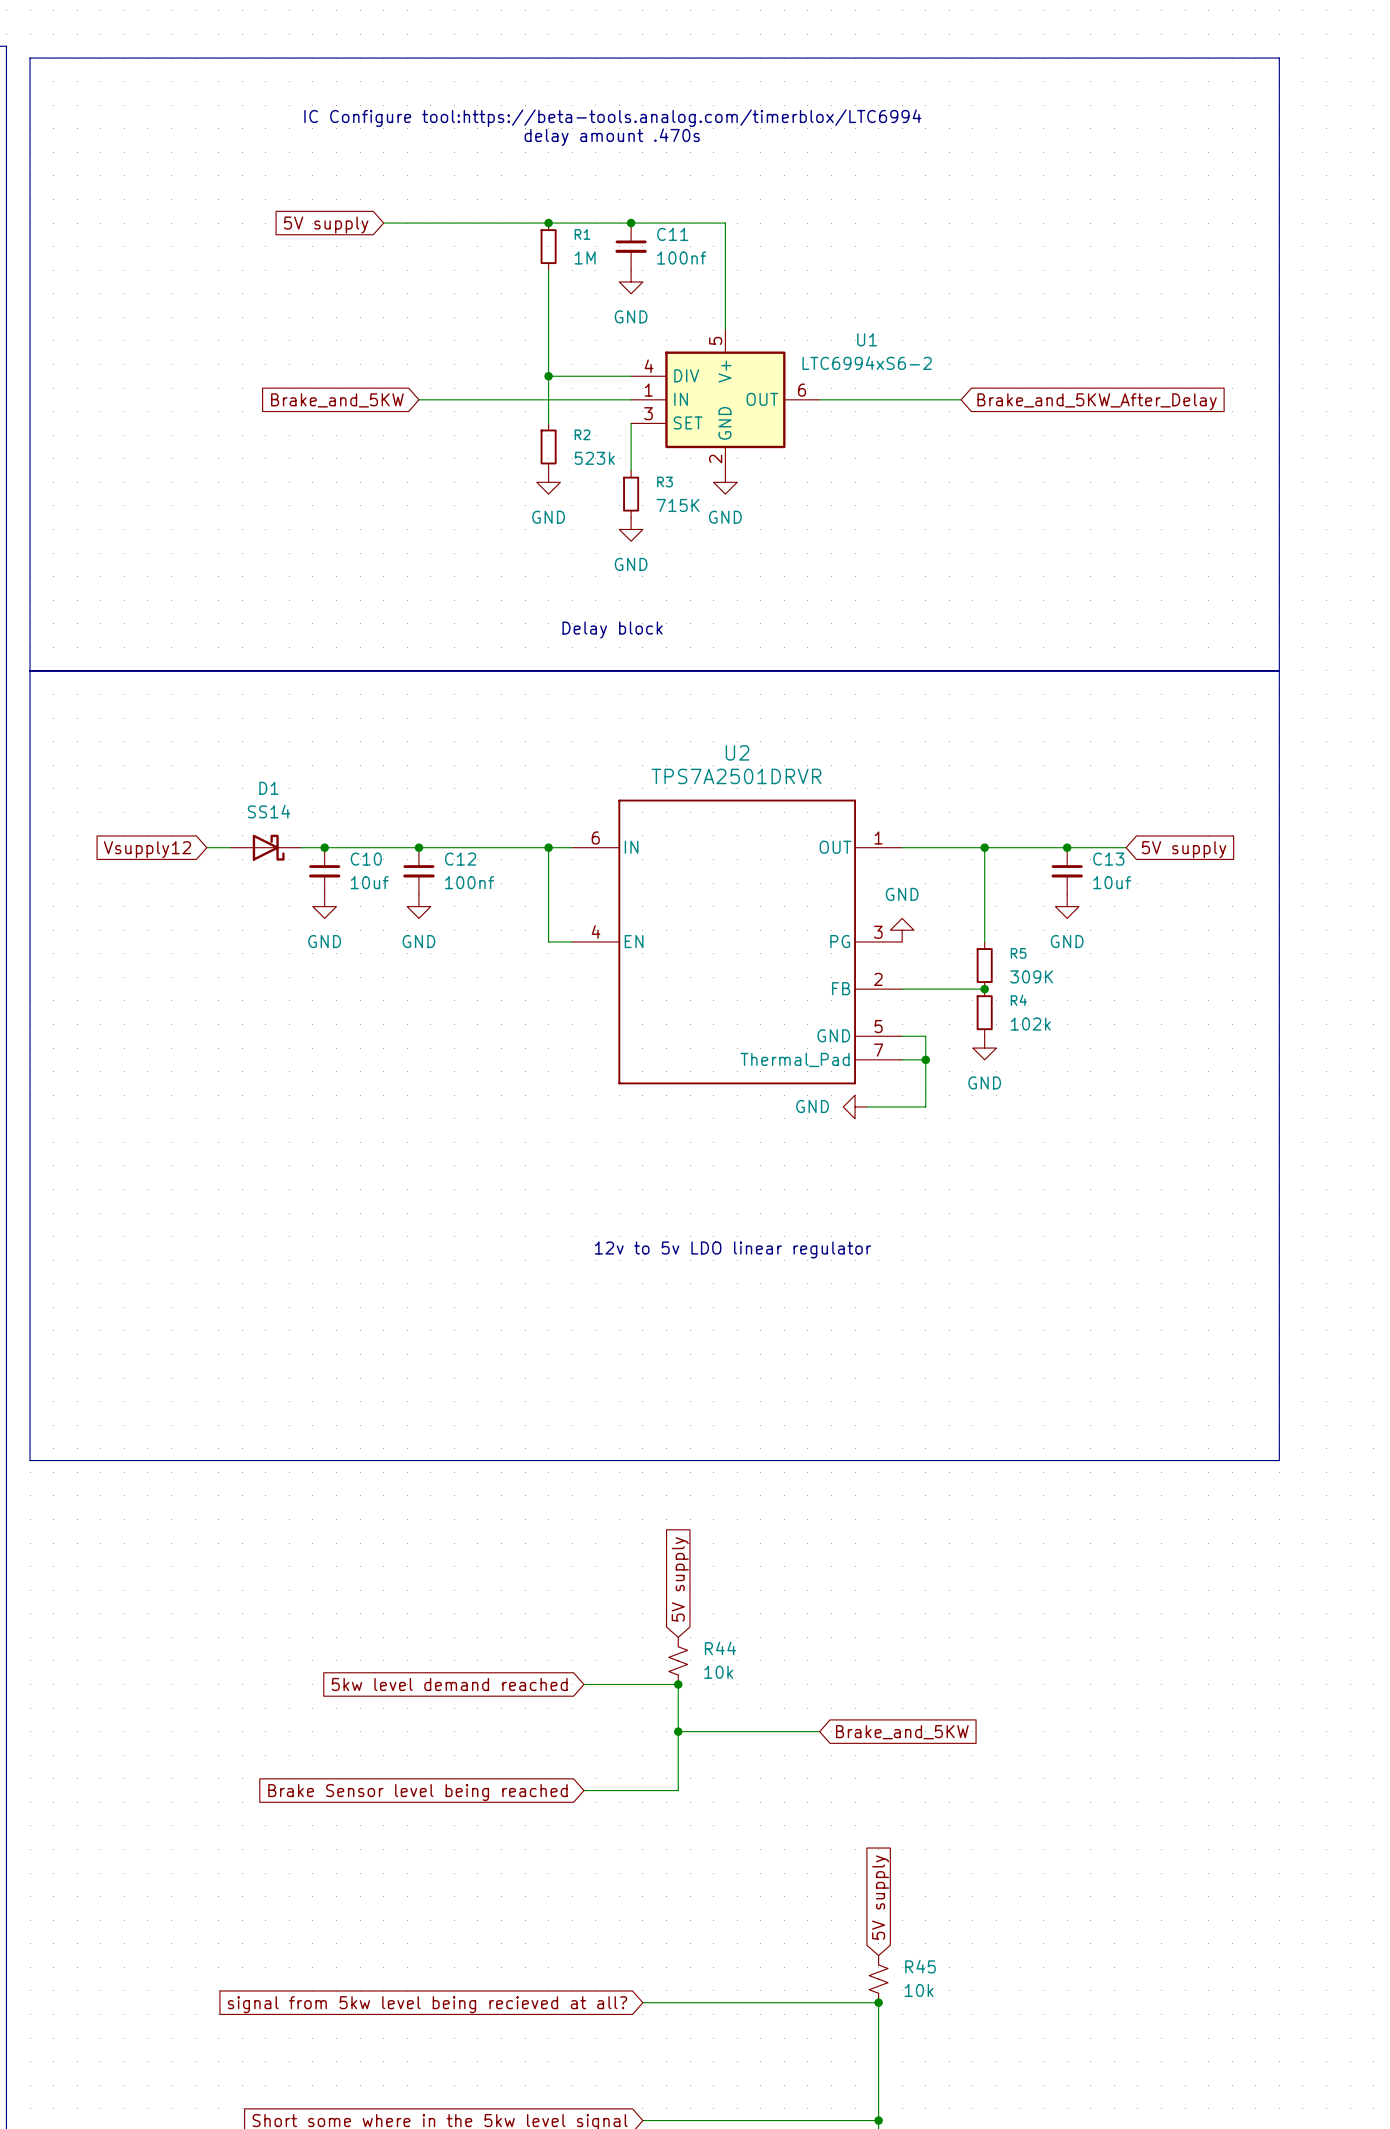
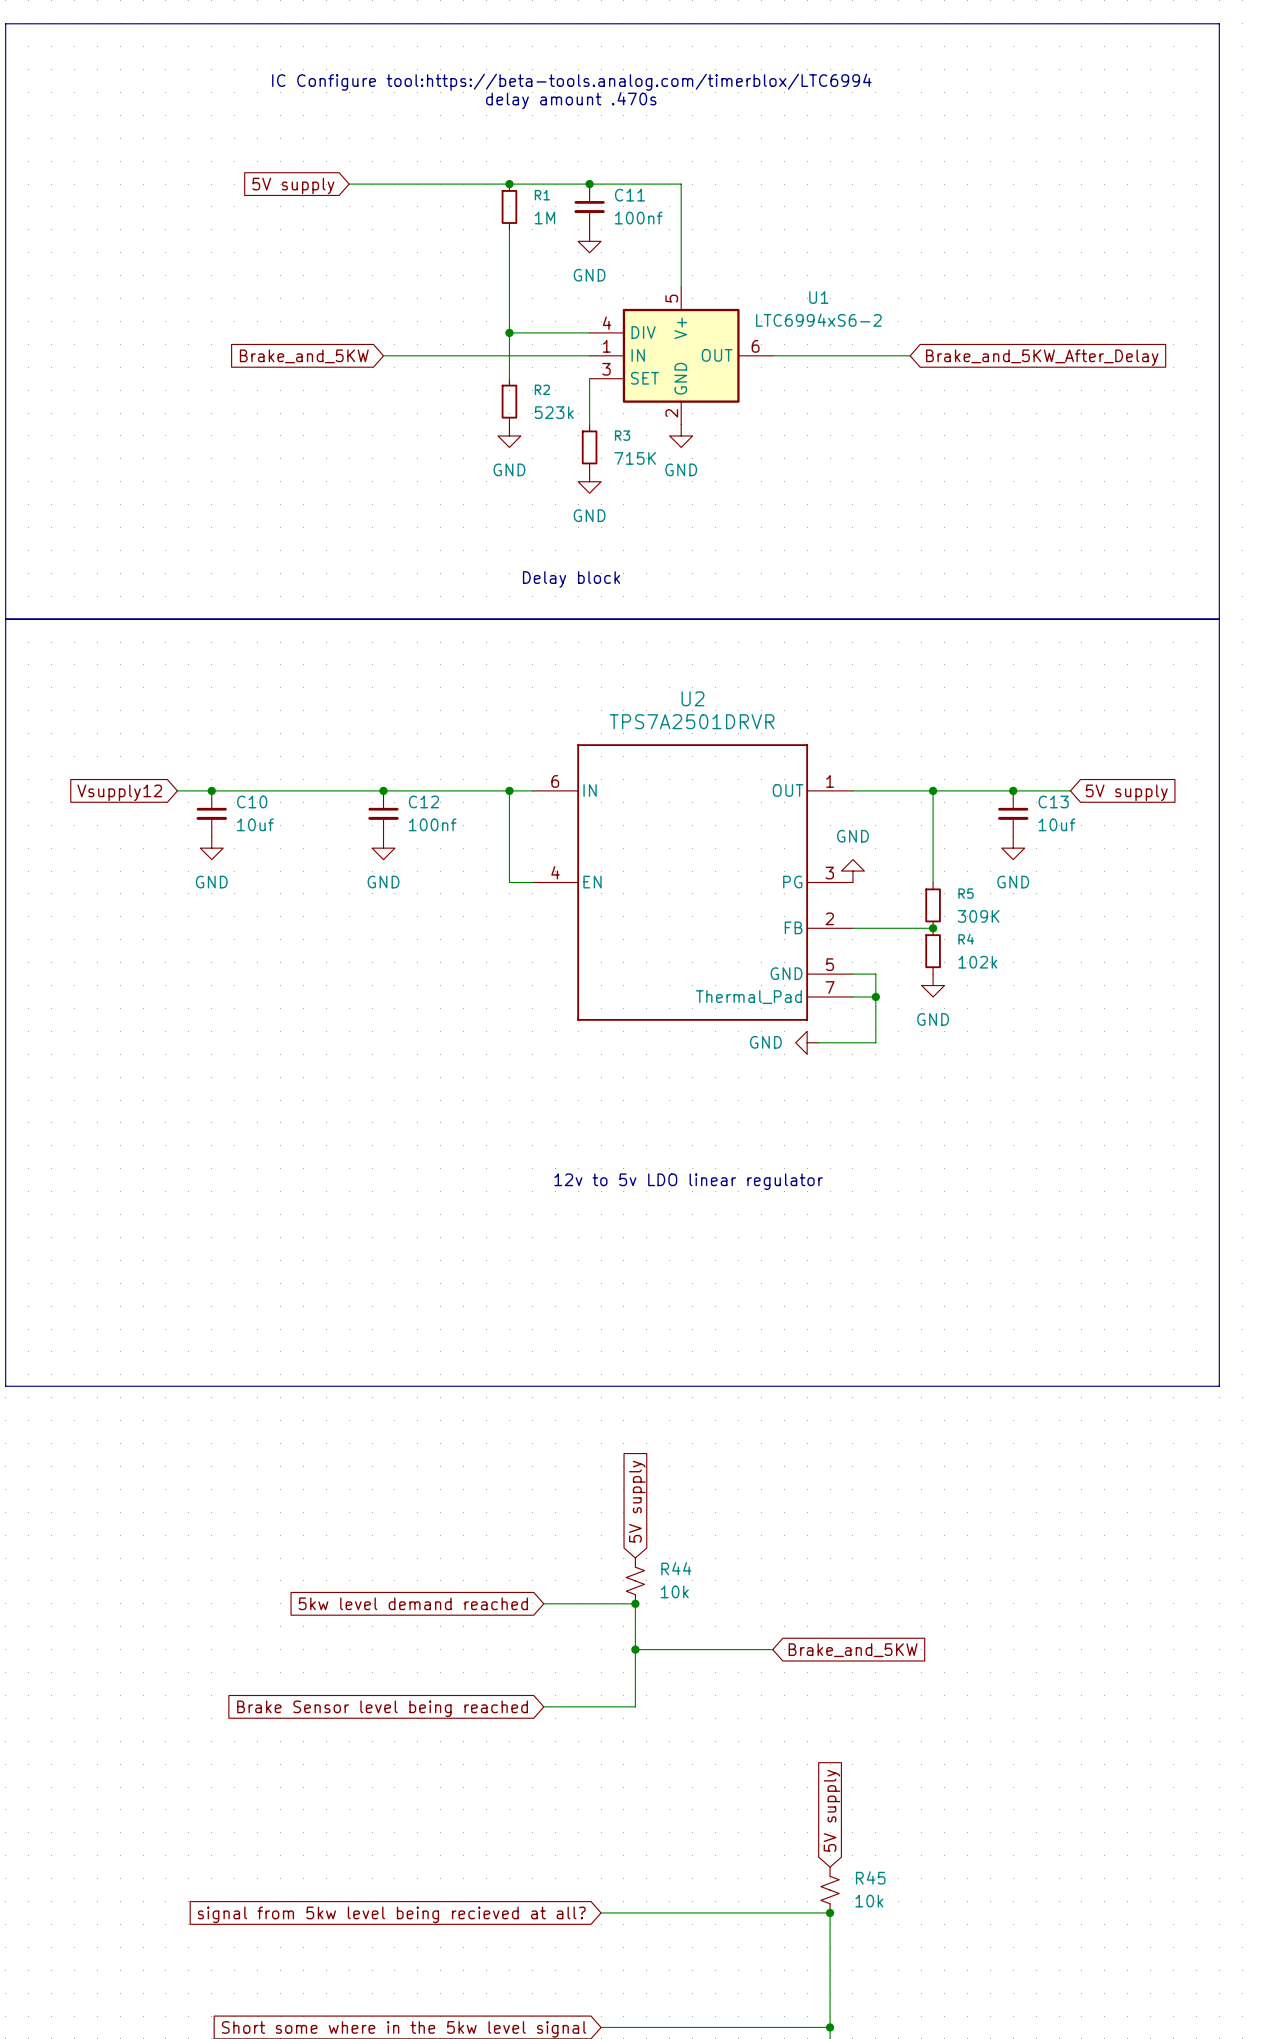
junction: none -> (211, 790)
D1: SS14 (265, 847) -> none
junction: (324, 847) -> none
C10 position: (324, 871) -> (211, 813)
power symbol position: GND (324, 906) -> GND (211, 848)

